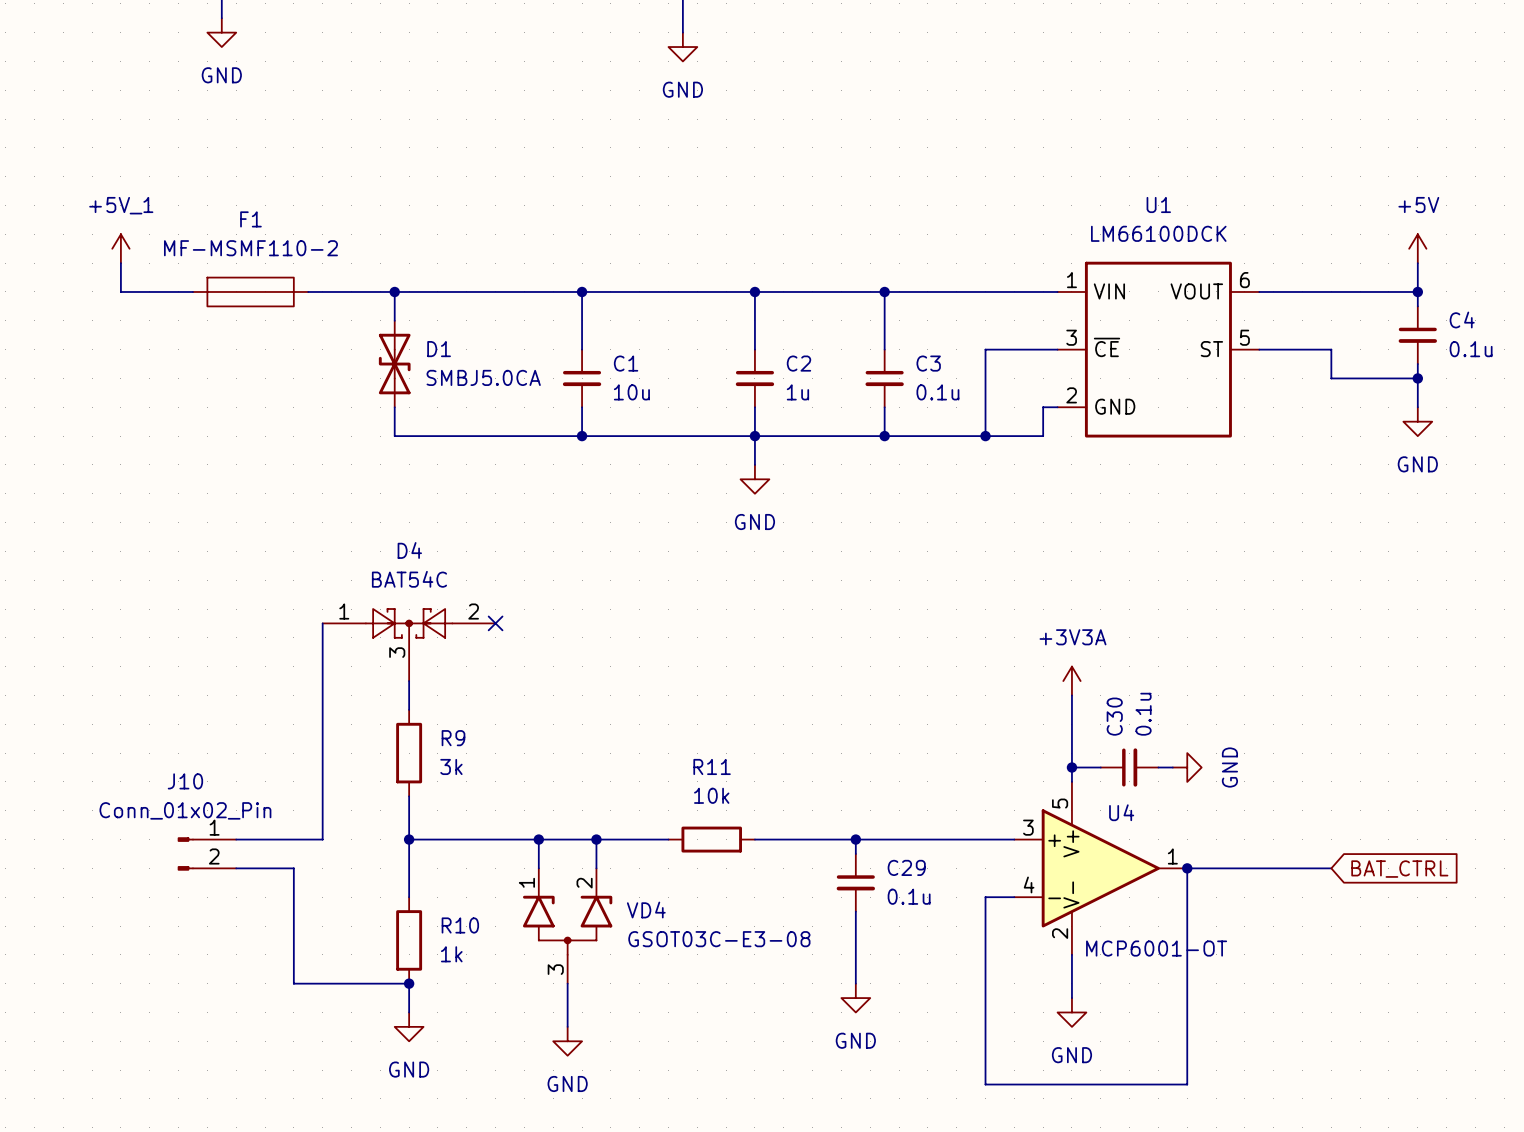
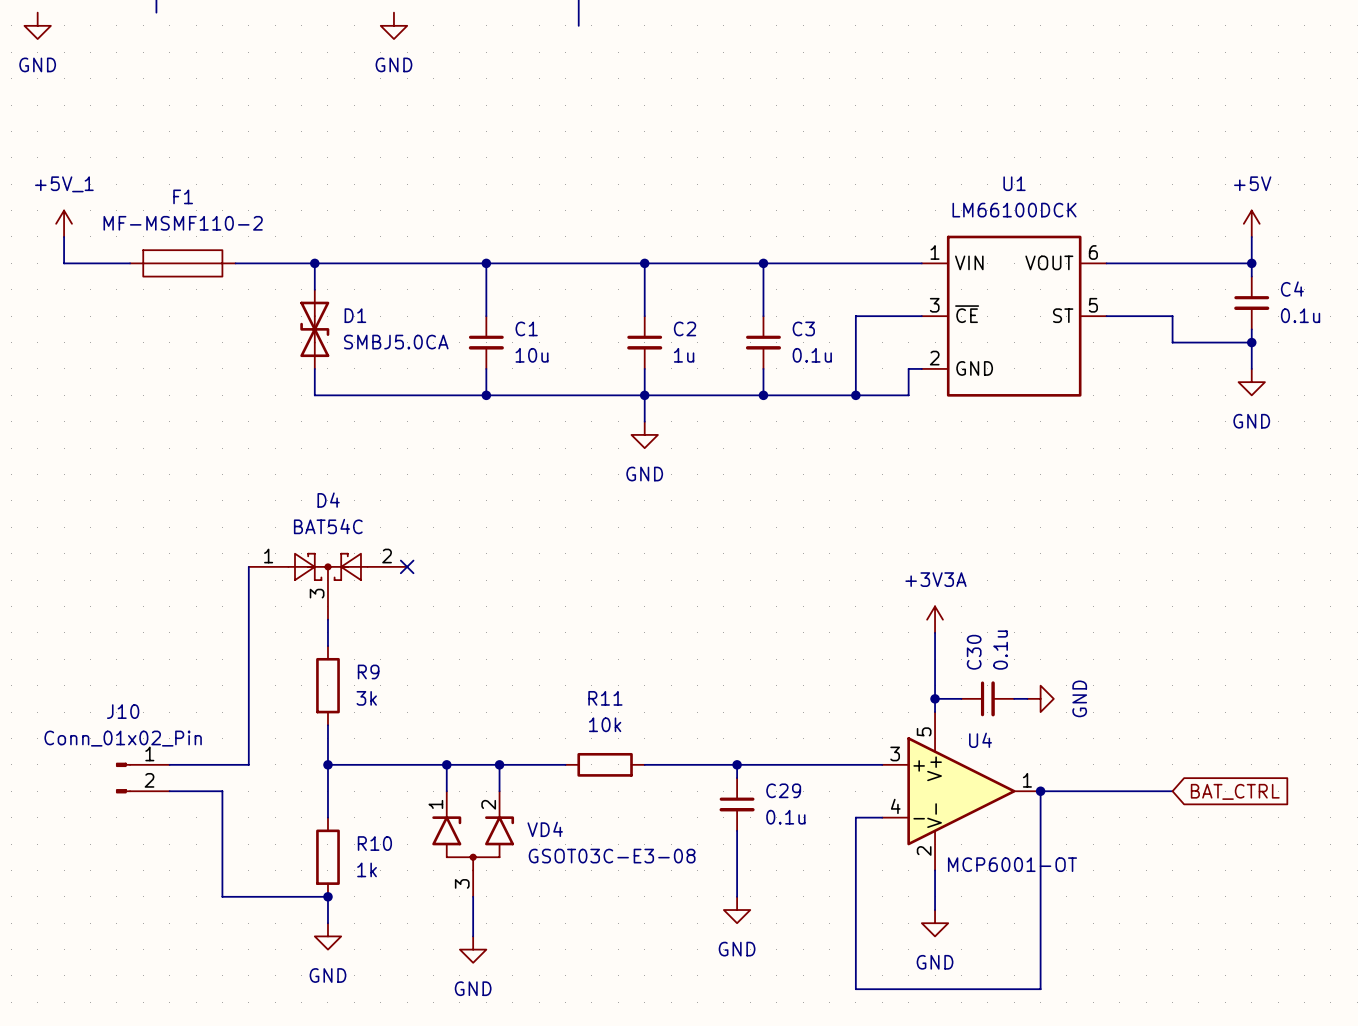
power symbol: none -> GND (37, 25)
power symbol: GND (221, 32) -> none
power symbol: none -> GND (393, 25)
power symbol: GND (682, 47) -> none

